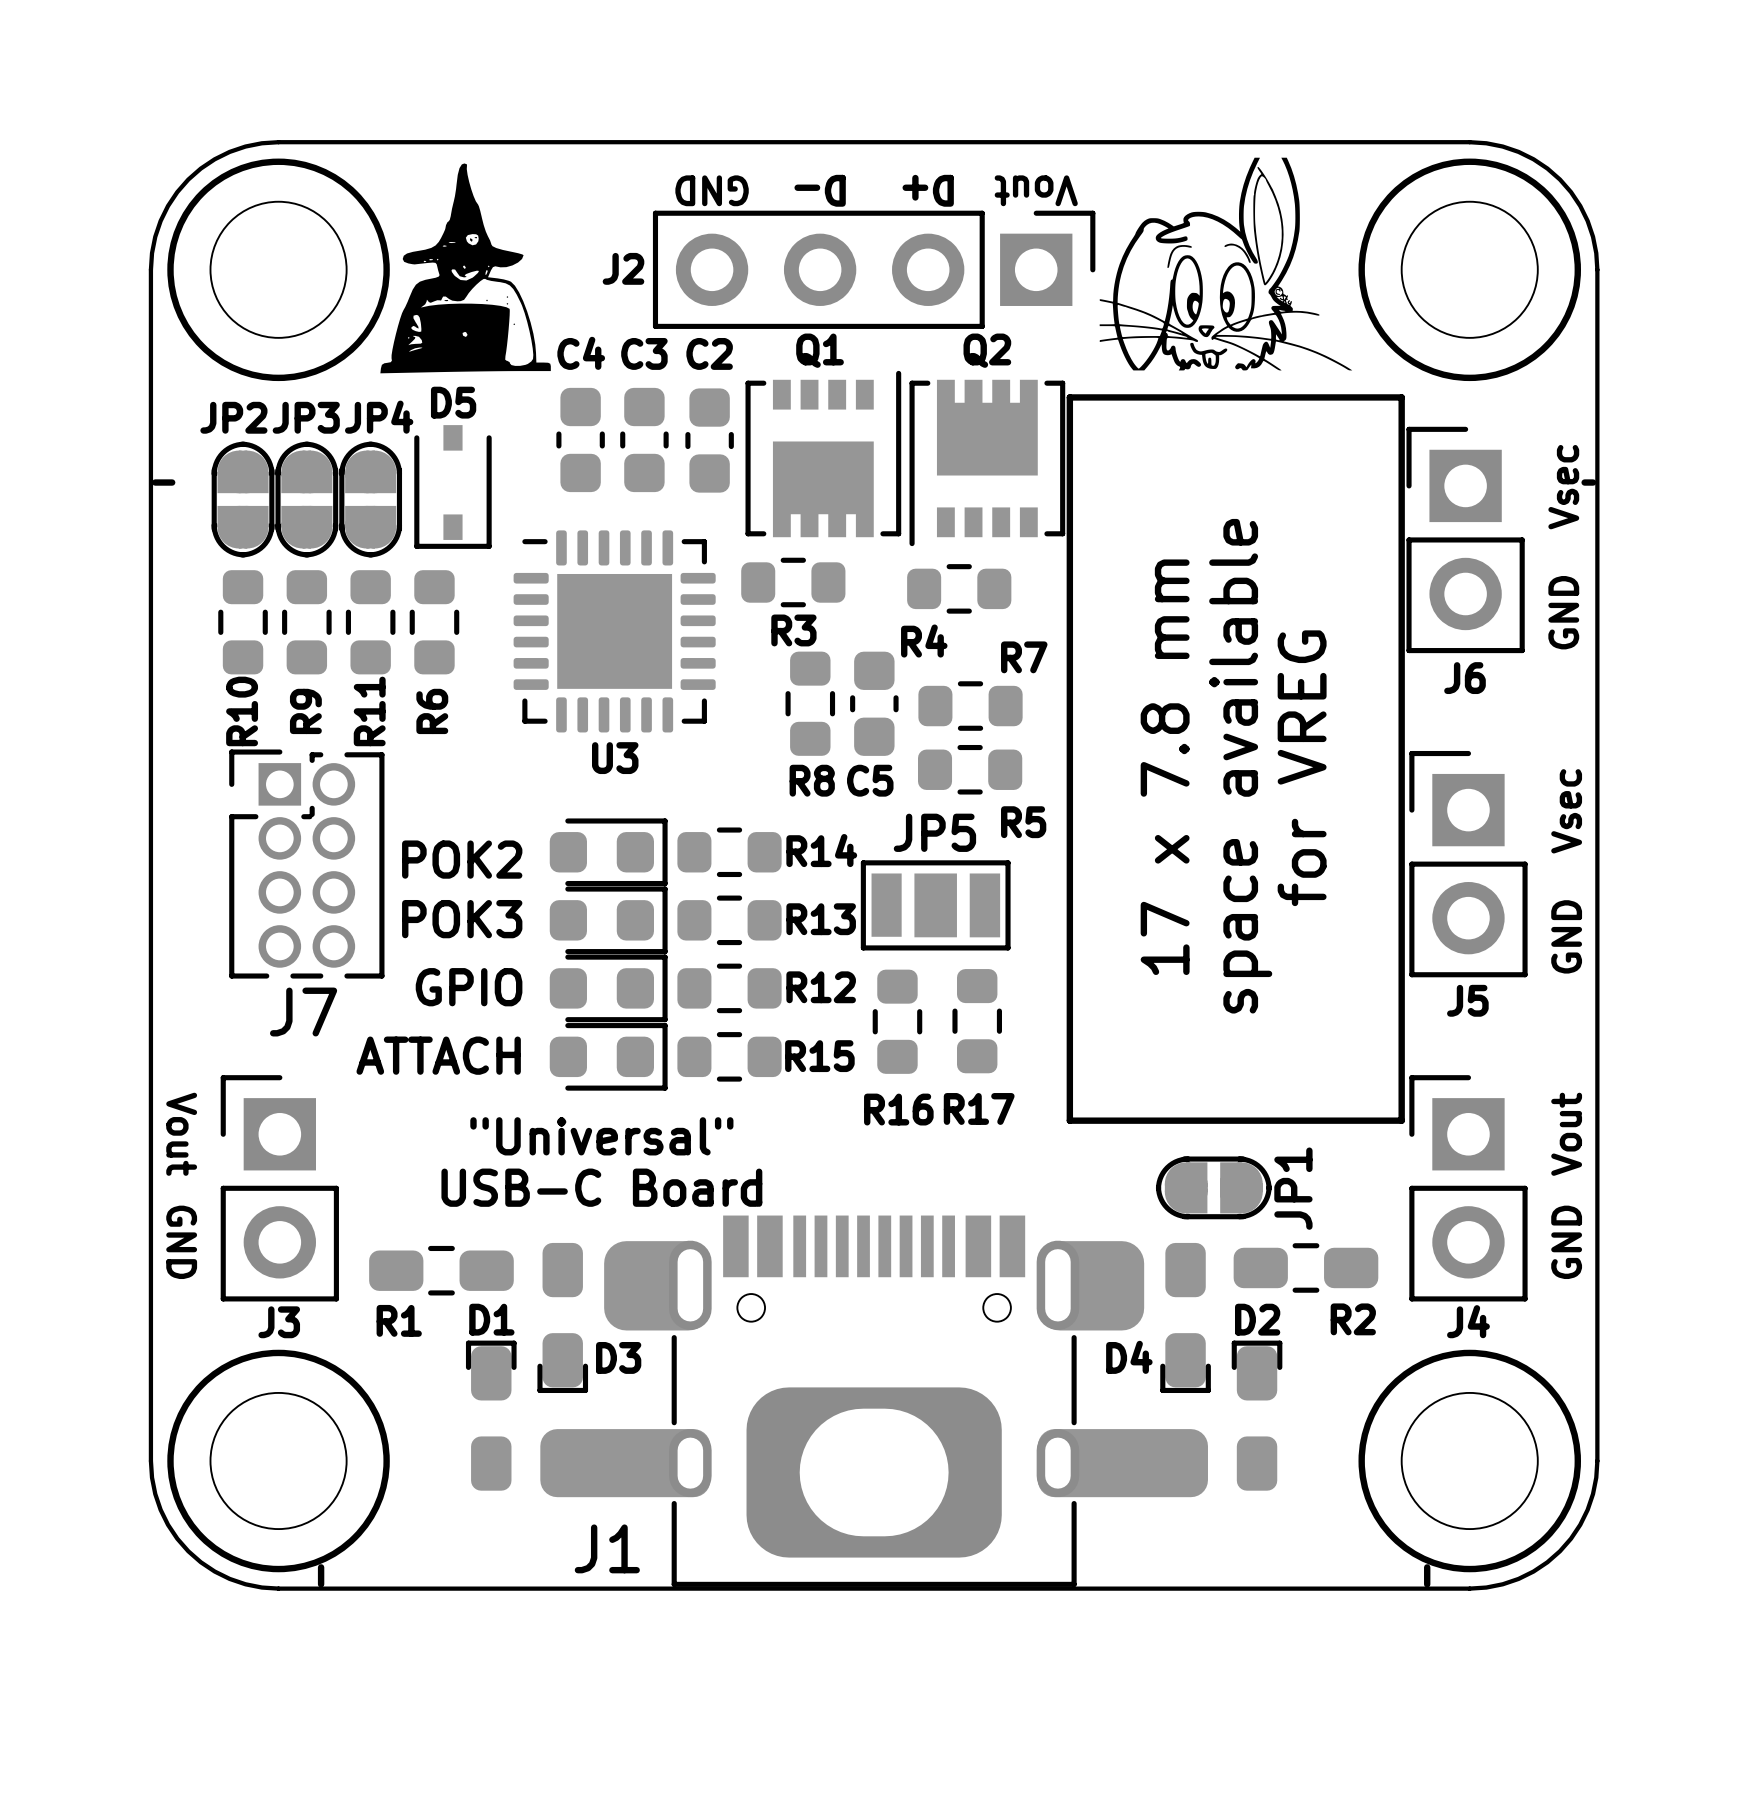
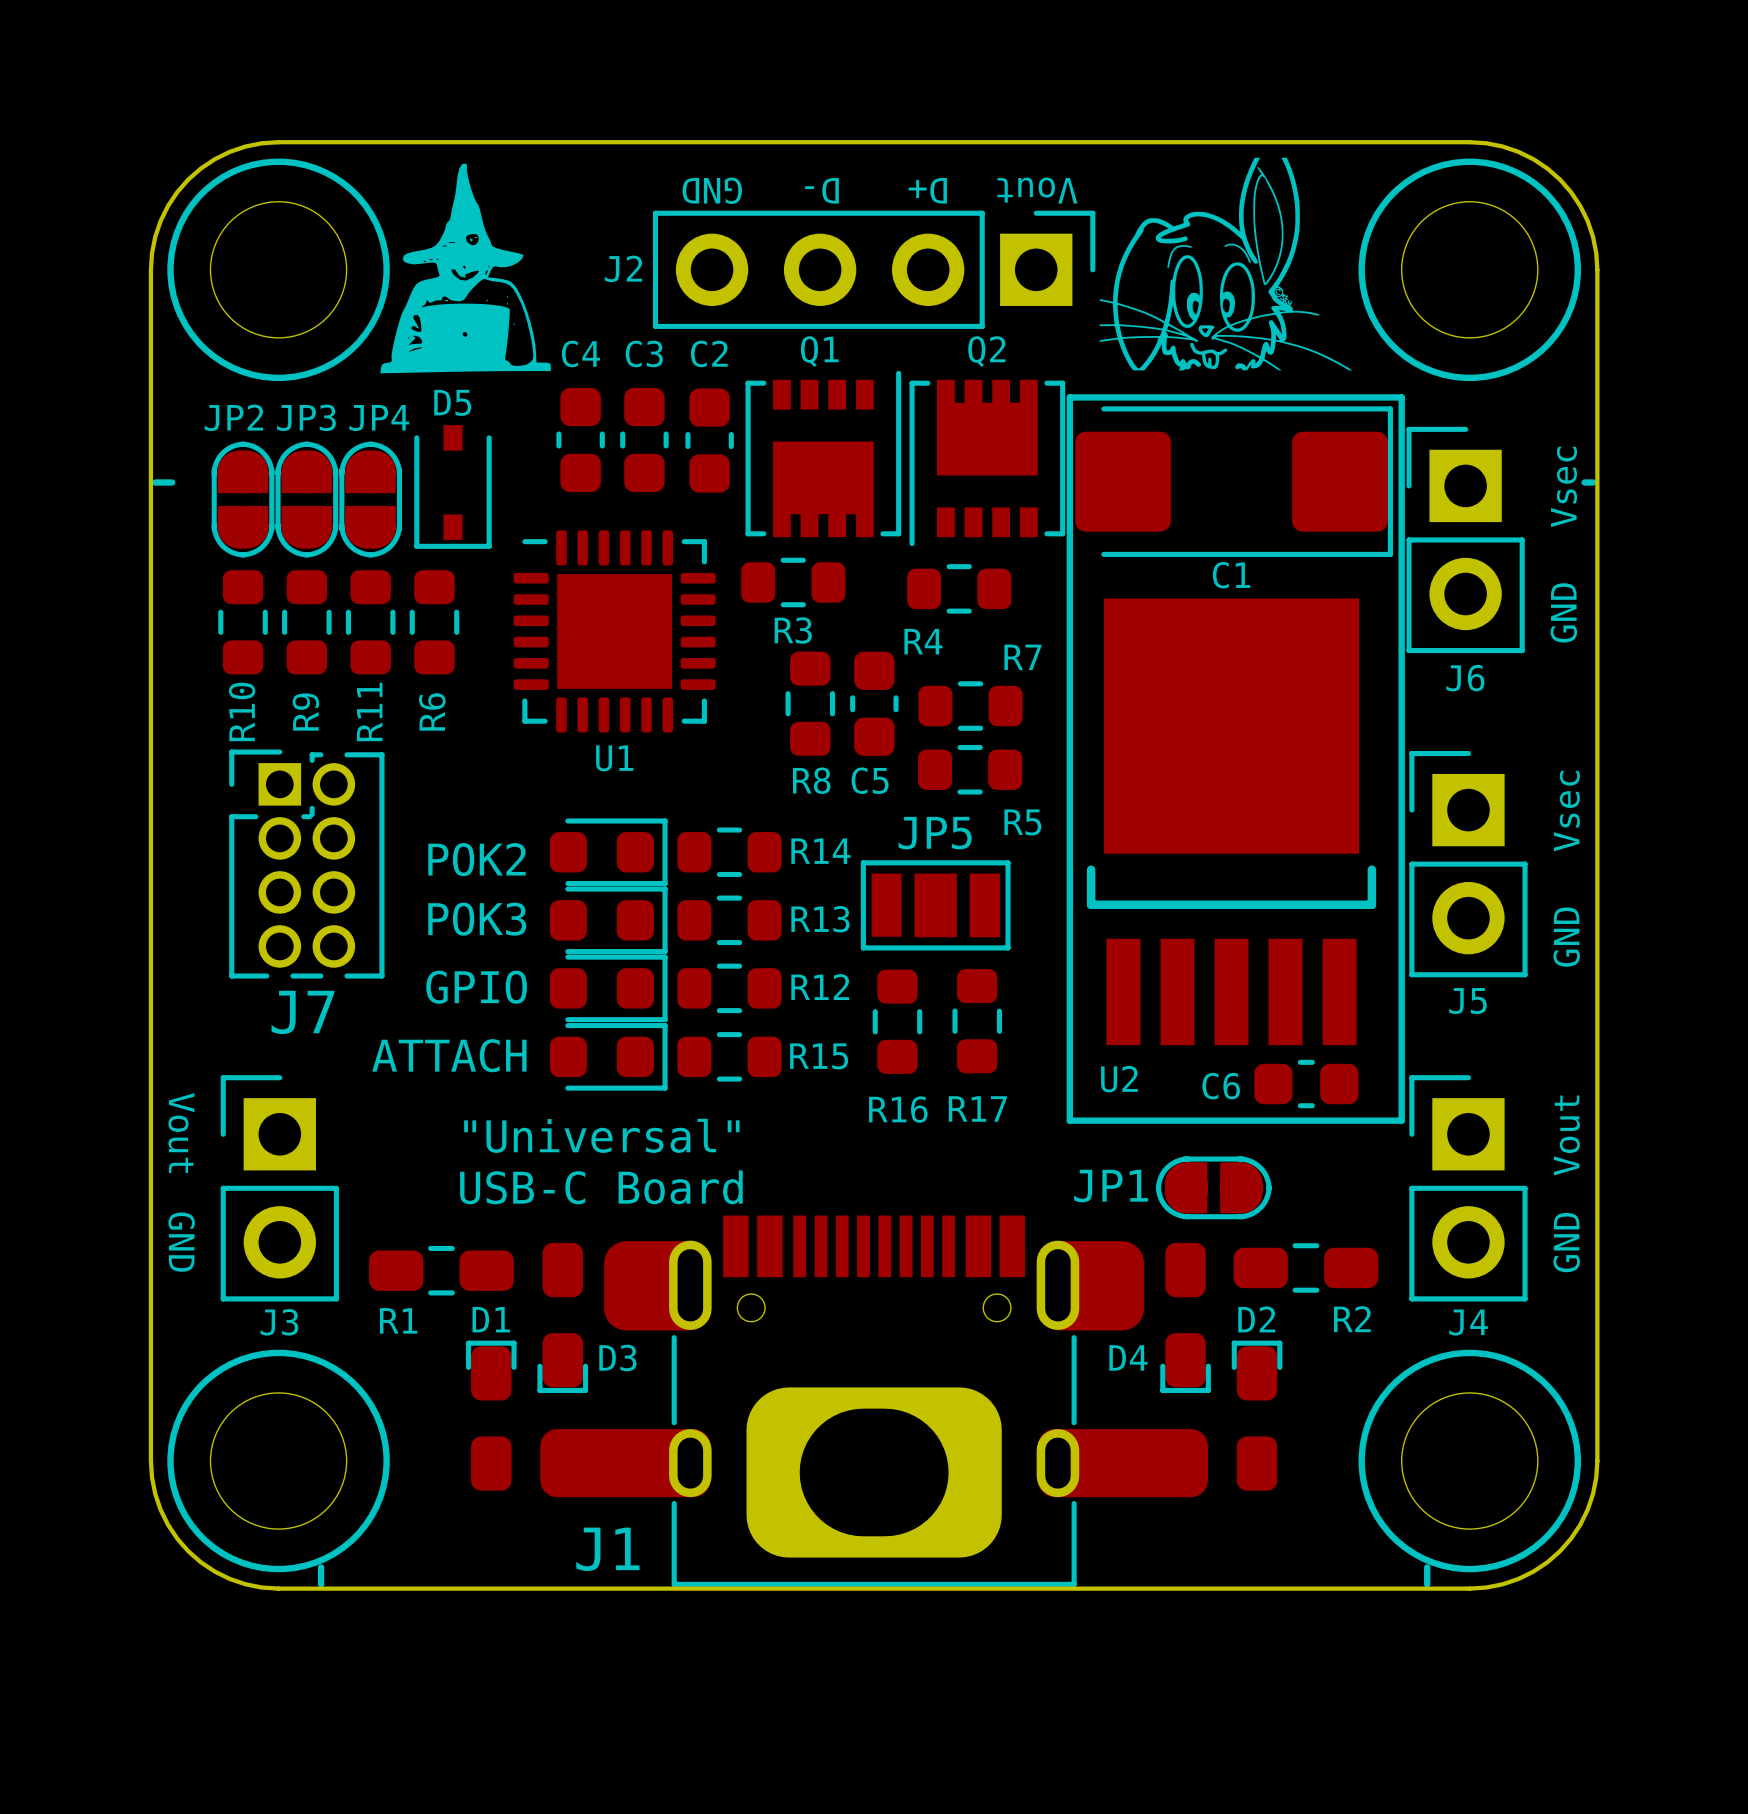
C1: none -> (1234, 481)
U3 name: U3 (615, 758) -> U1 (614, 758)
text: space available (1240, 766) -> none
text: 17 x 7.8 mm (1165, 767) -> none
text: for VREG (1302, 768) -> none
U2: none -> (1231, 821)
C6: none -> (1306, 1084)
JP1 name rotation: 0° (1293, 1188) -> 90° clockwise (1111, 1186)
JP1 name position: JP1 (1293, 1188) -> JP1 (1111, 1186)

